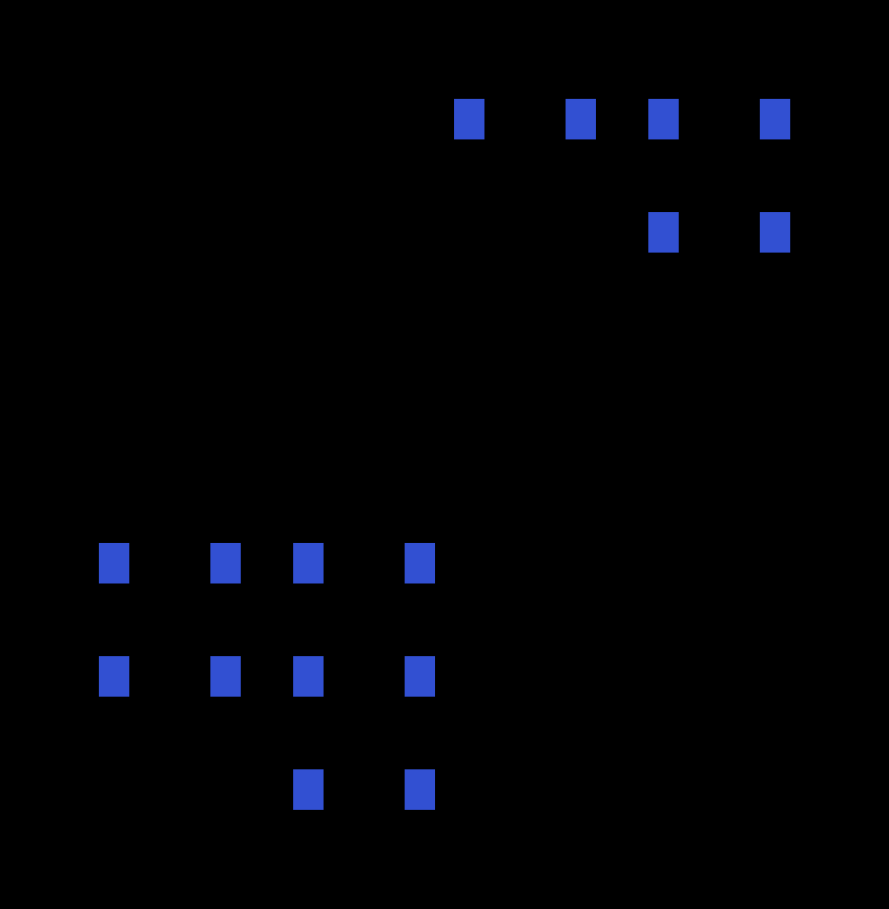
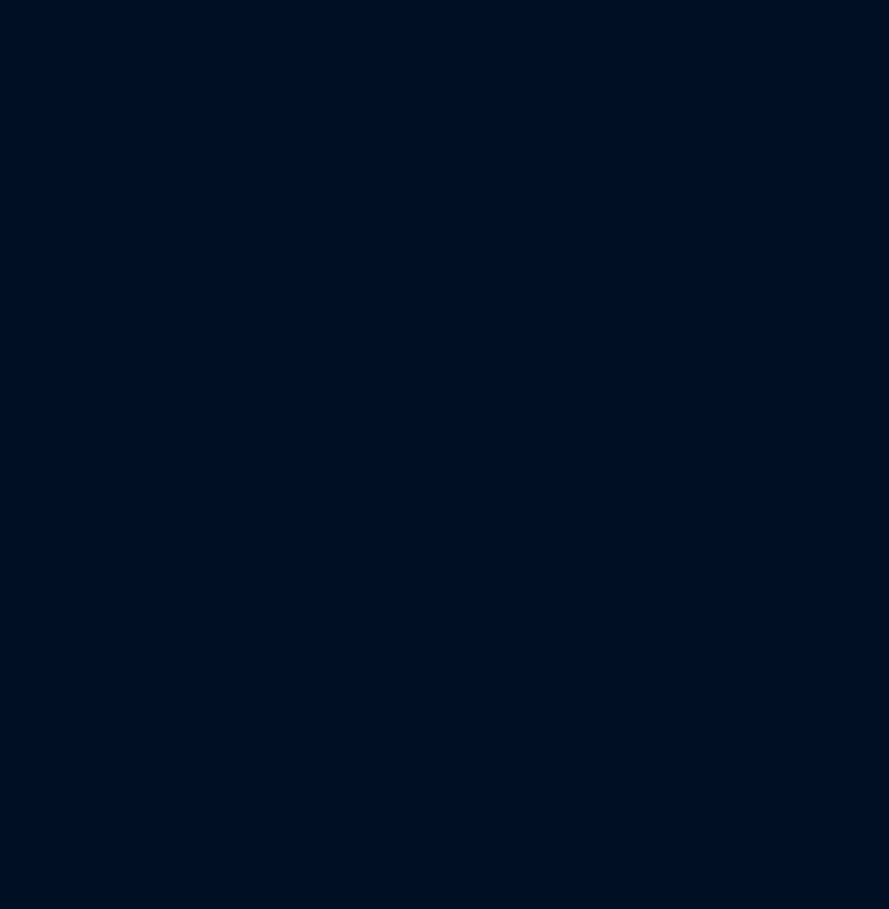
part: (525, 119) -> none
part: (719, 119) -> none
part: (719, 232) -> none
part: (169, 563) -> none
part: (364, 563) -> none
part: (169, 676) -> none
part: (364, 676) -> none
part: (364, 789) -> none

